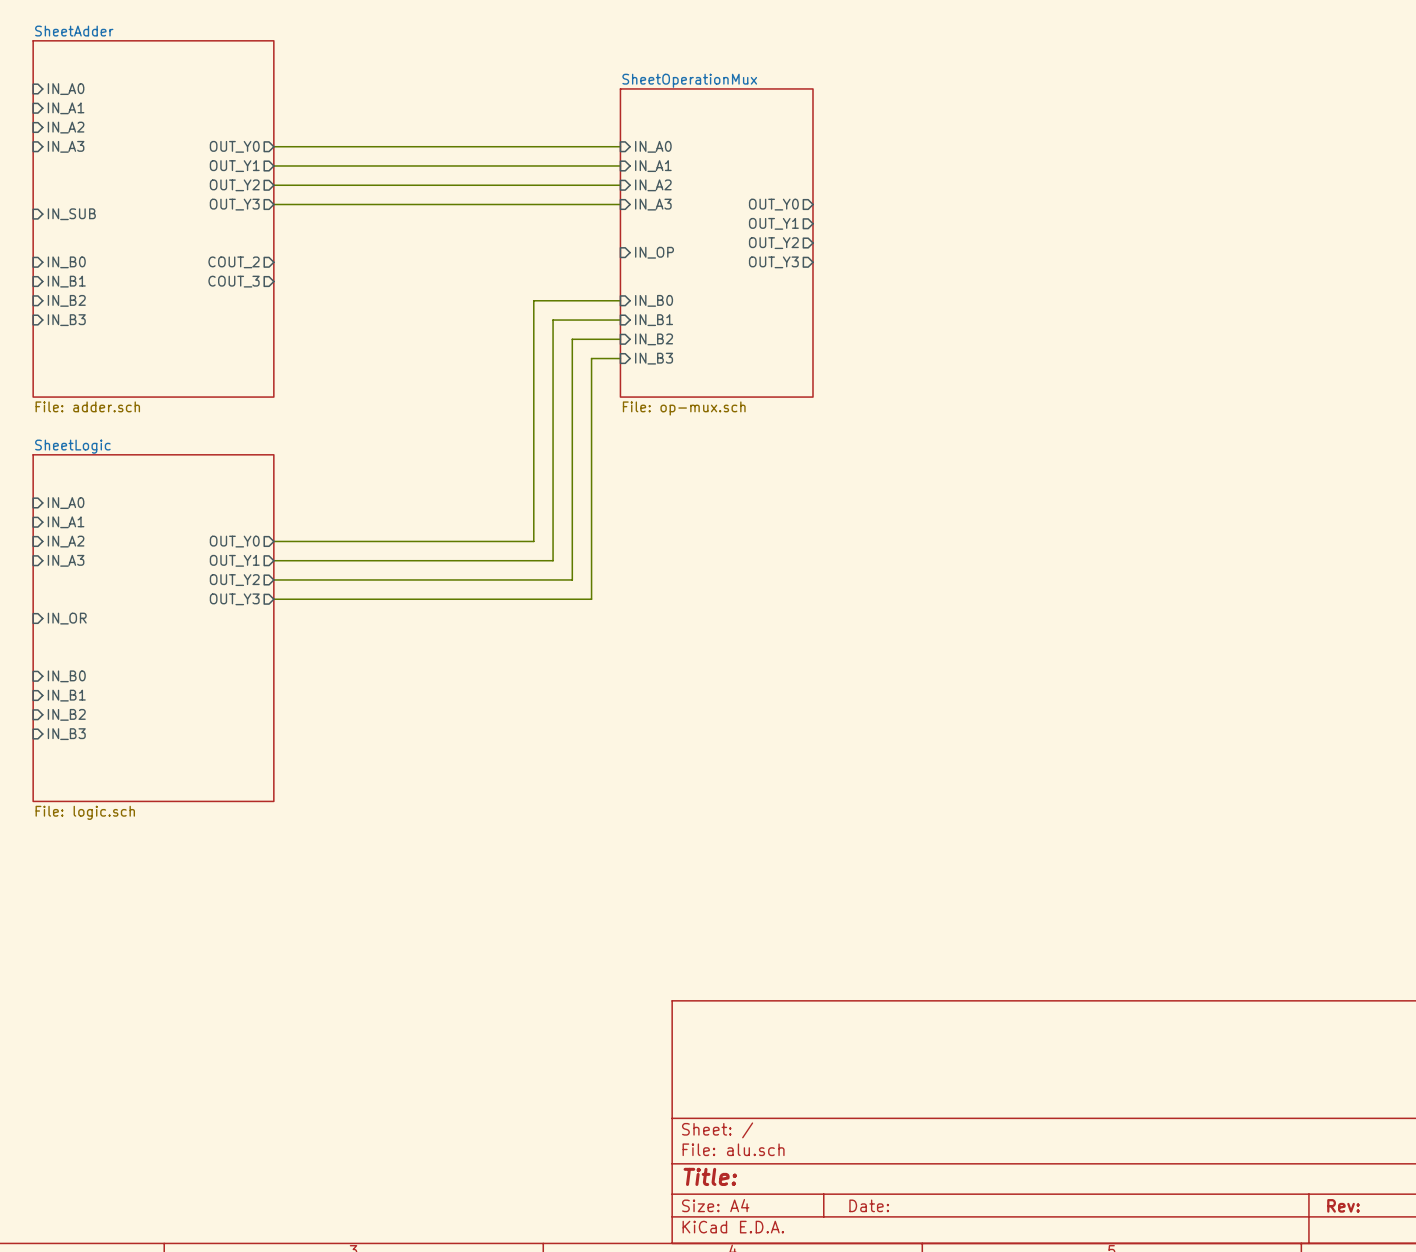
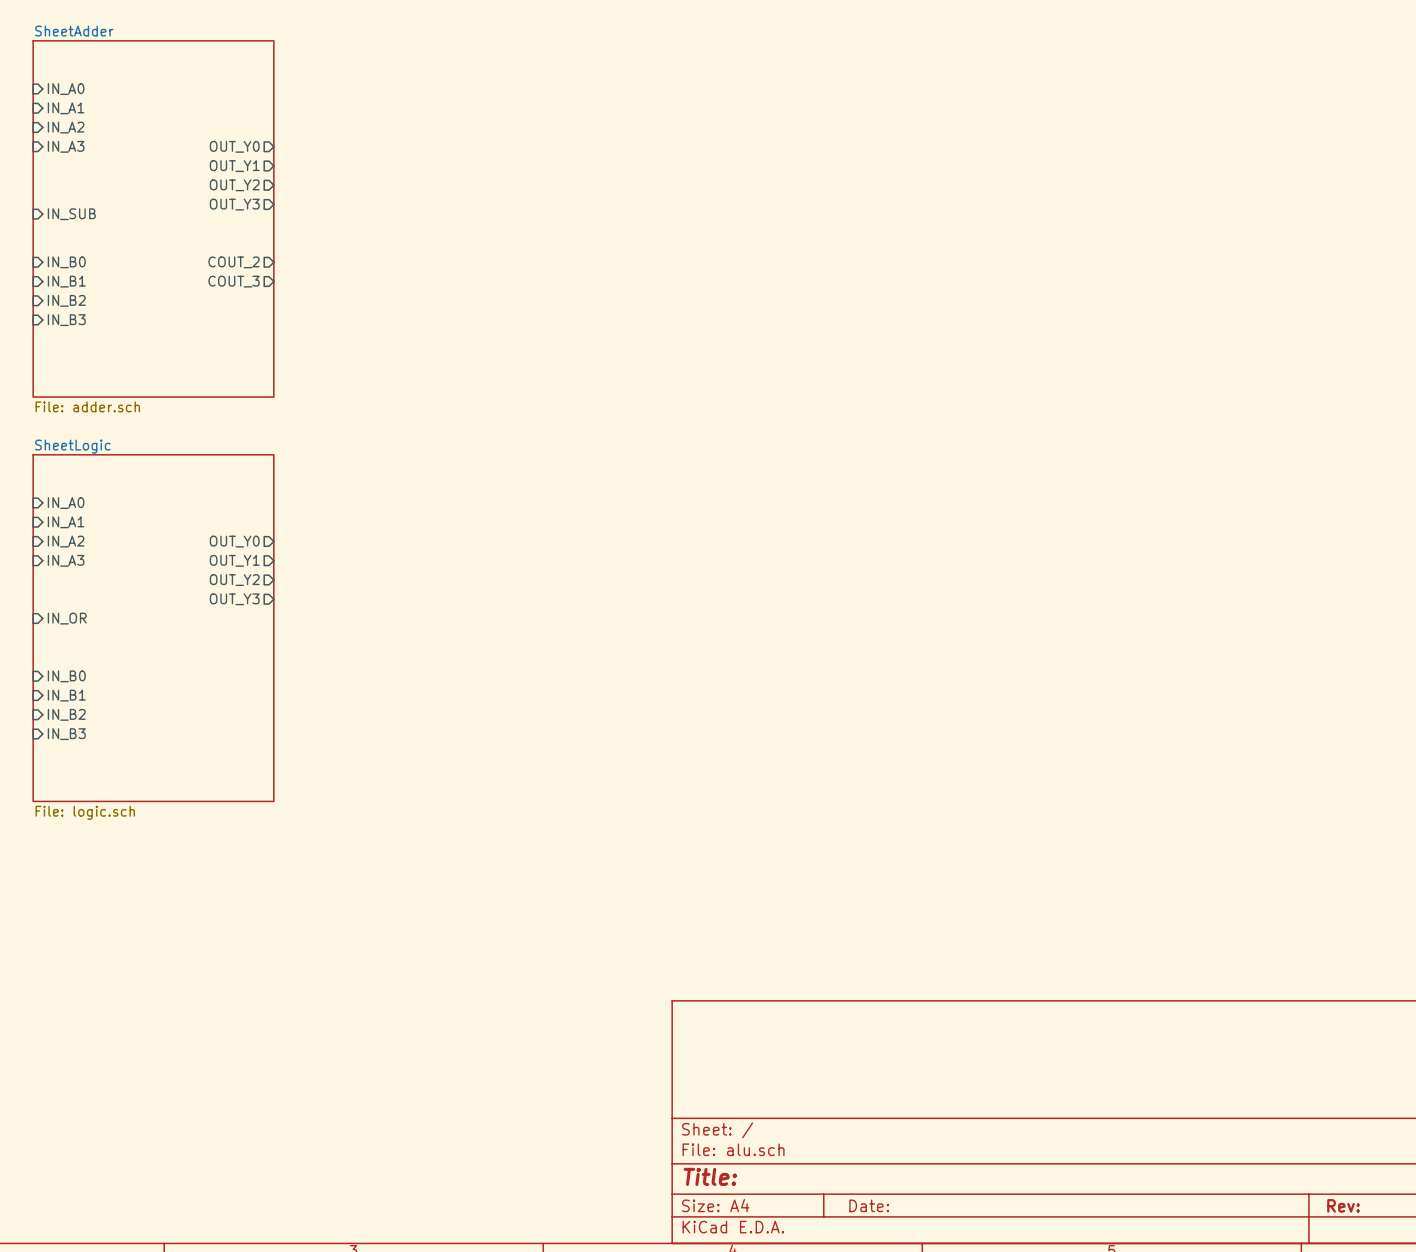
wire: (273, 146) (620, 146) -> none
sheet pin: IN_A0 (653, 146) -> none
wire: (273, 165) (620, 165) -> none
sheet pin: IN_A1 (653, 166) -> none
wire: (273, 185) (620, 185) -> none
sheet pin: IN_A2 (653, 185) -> none
wire: (273, 204) (620, 204) -> none
sheet pin: IN_A3 (653, 204) -> none
sheet pin: OUT_Y0 (773, 204) -> none
sheet pin: OUT_Y1 (773, 223) -> none
sheet SheetOperationMux: File: op-mux.sch (716, 243) -> none
sheet pin: OUT_Y2 (773, 243) -> none
sheet pin: IN_OP (654, 252) -> none
sheet pin: OUT_Y3 (773, 262) -> none
wire: (620, 300) (533, 300) (533, 541) (273, 541) -> none
sheet pin: IN_B0 (654, 300) -> none
wire: (620, 320) (553, 320) (553, 560) (273, 560) -> none
sheet pin: IN_B1 (654, 320) -> none
wire: (620, 339) (572, 339) (572, 579) (273, 579) -> none
sheet pin: IN_B2 (654, 339) -> none
wire: (620, 358) (591, 358) (591, 599) (273, 599) -> none
sheet pin: IN_B3 (654, 358) -> none

